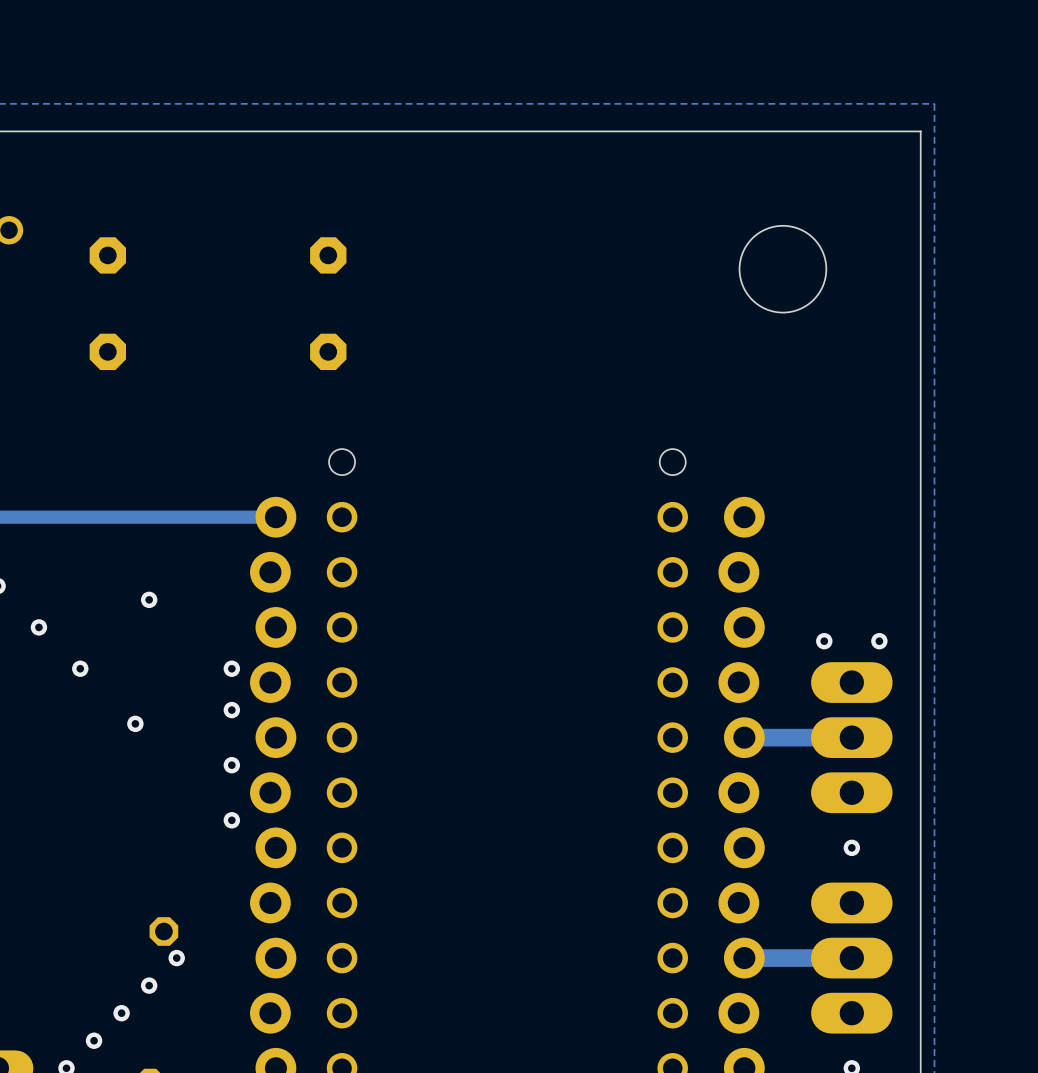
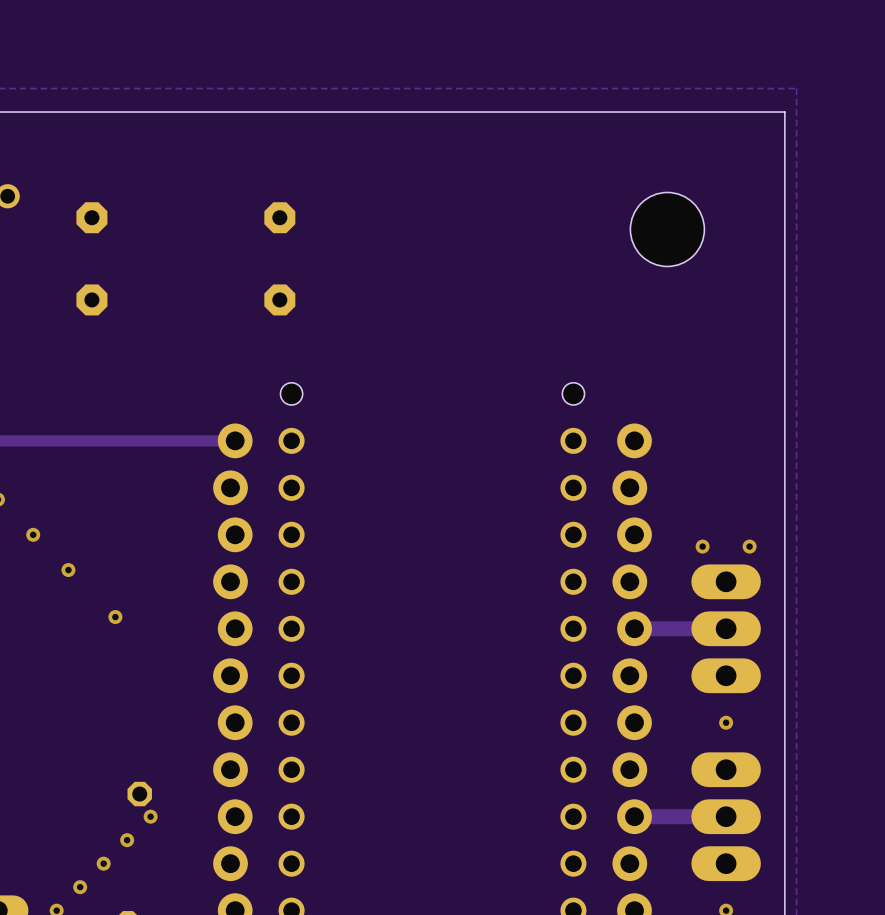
via: (149, 599) -> none
via: (231, 668) -> none
via: (231, 710) -> none
via: (231, 765) -> none
via: (231, 820) -> none

